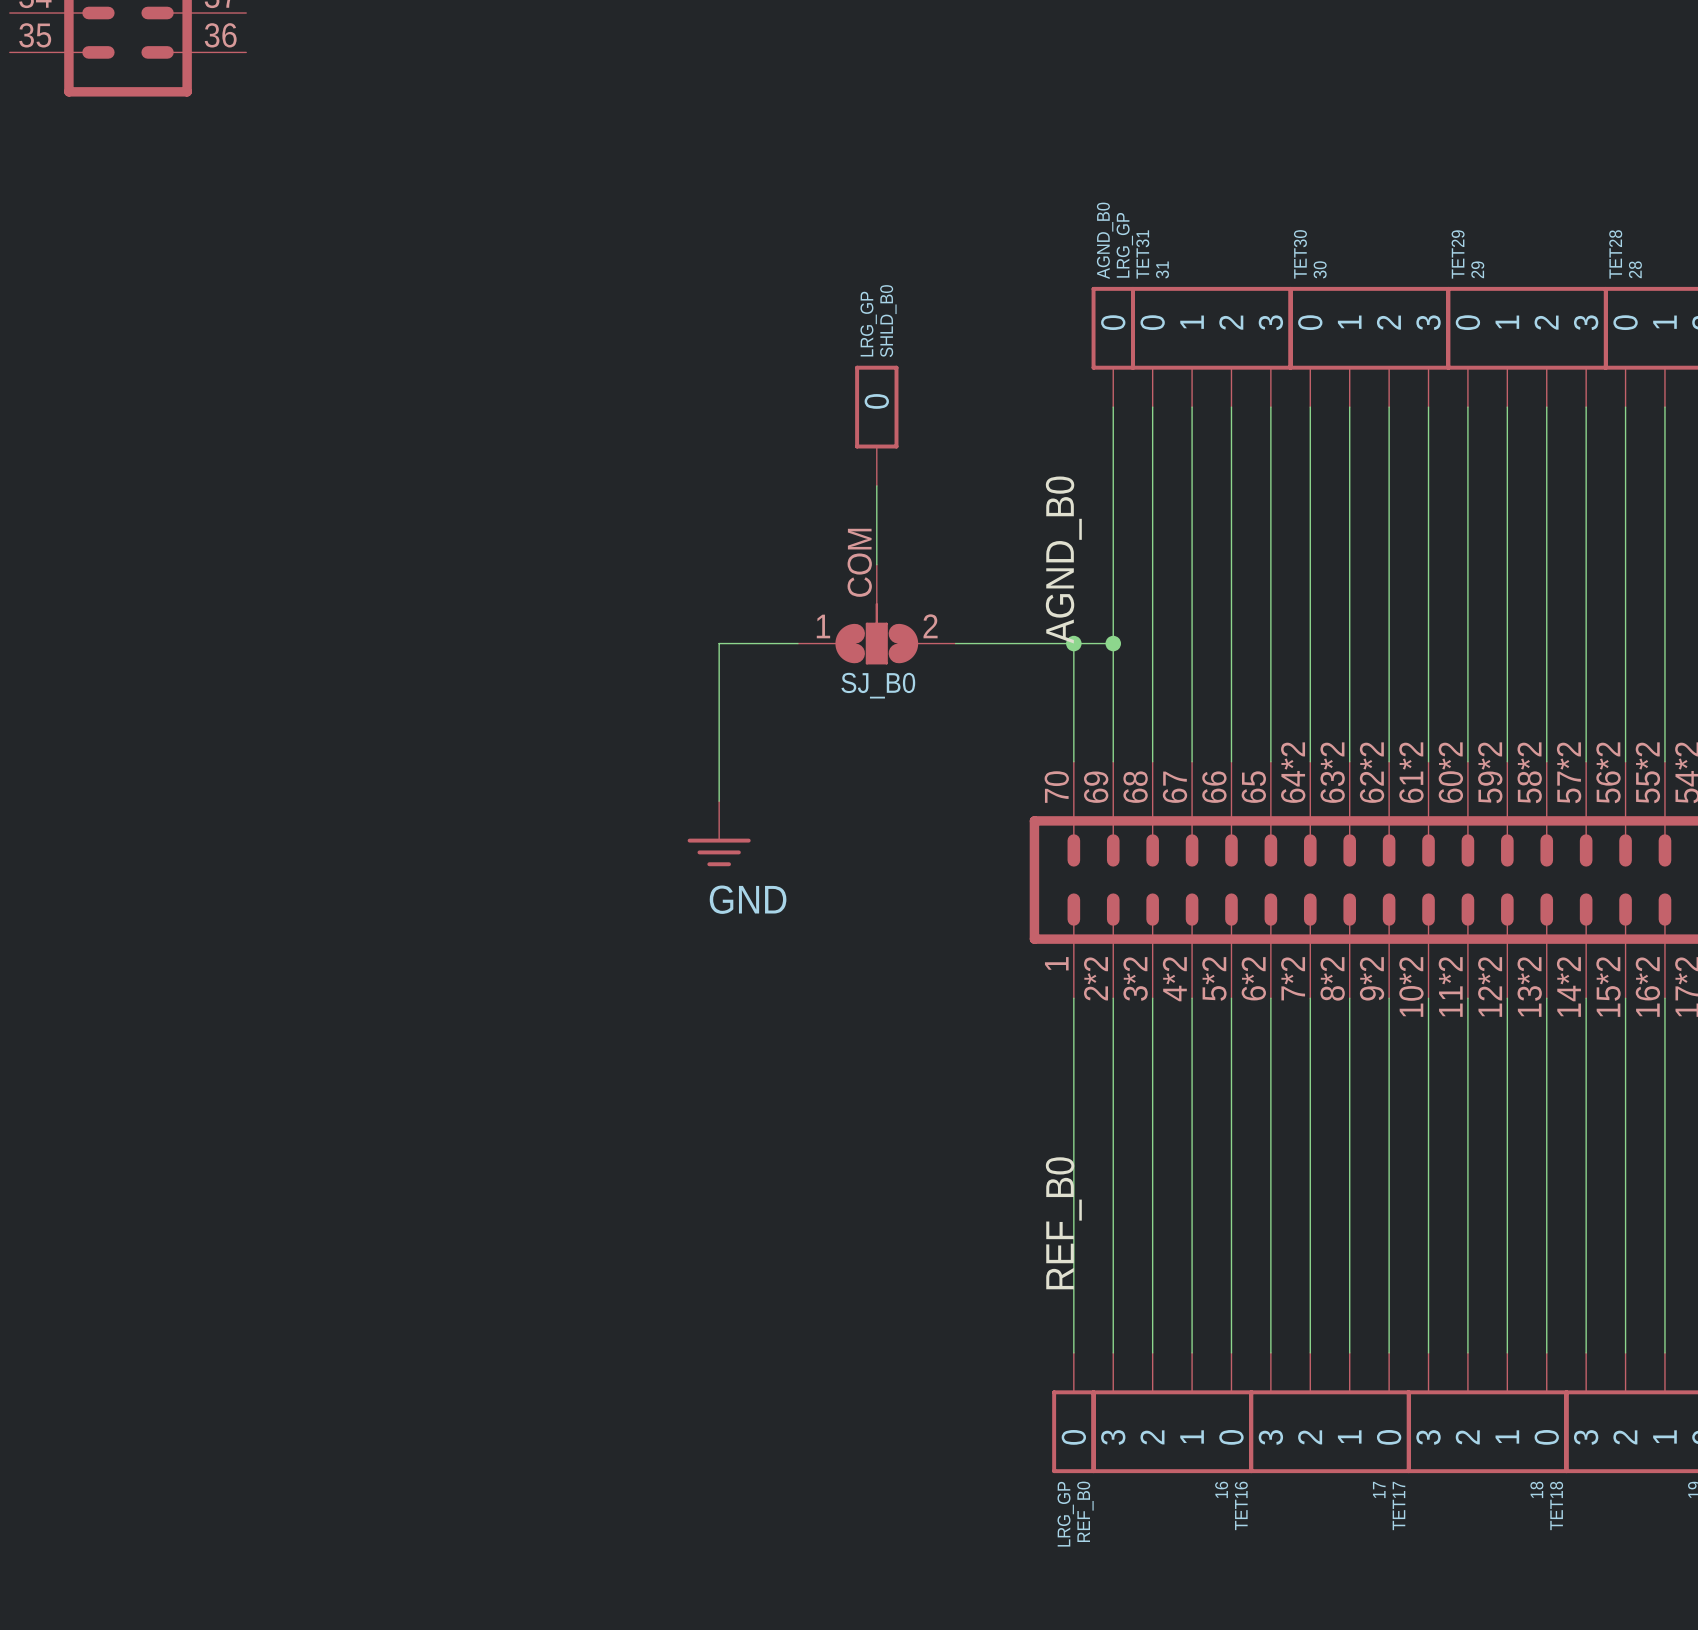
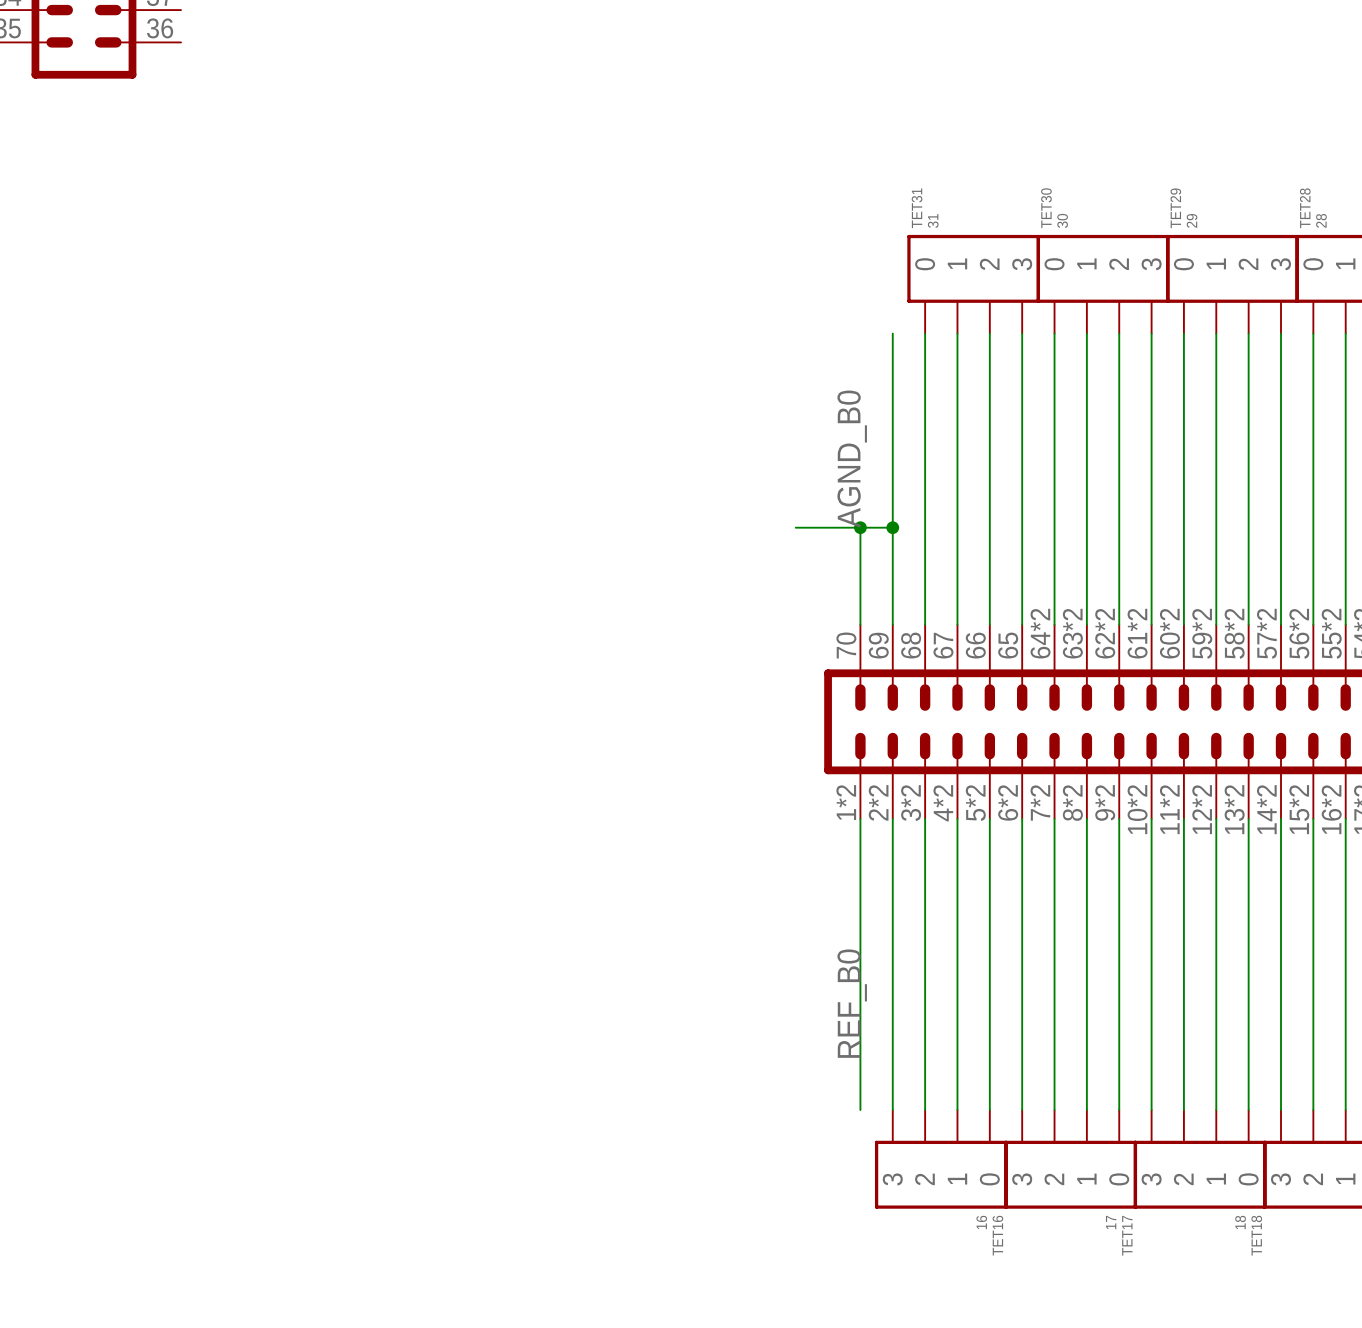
AGND_B0: LRG_GP (1113, 347) -> none
SHLD_B0: LRG_GP (876, 425) -> none
wire: (876, 485) (876, 564) -> none
SJ_B0: (876, 614) -> none
wire: (797, 643) (719, 643) (719, 801) -> none
wire: (955, 643) (995, 643) -> none
power symbol: GND (719, 833) -> none
part pin number: 1 (1056, 963) -> 1*2 (846, 802)
REF_B0: LRG_GP (1073, 1413) -> none

